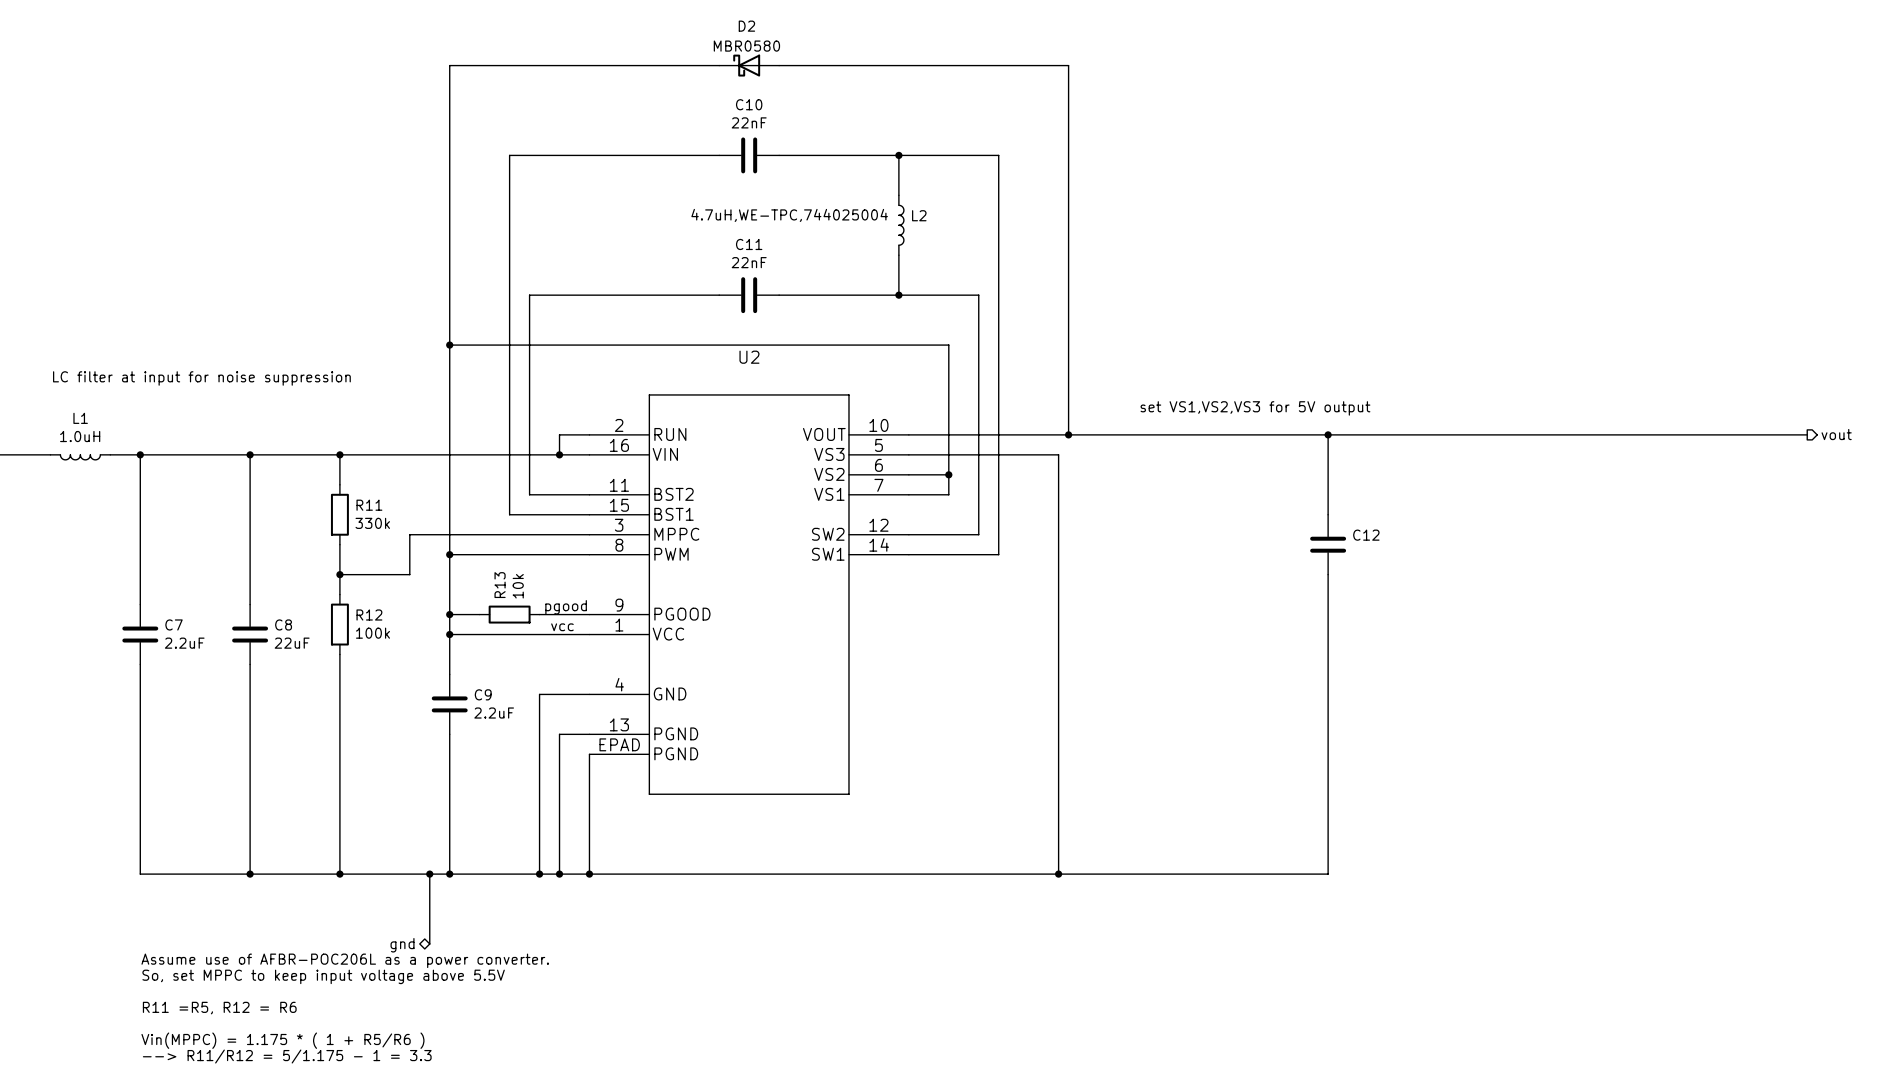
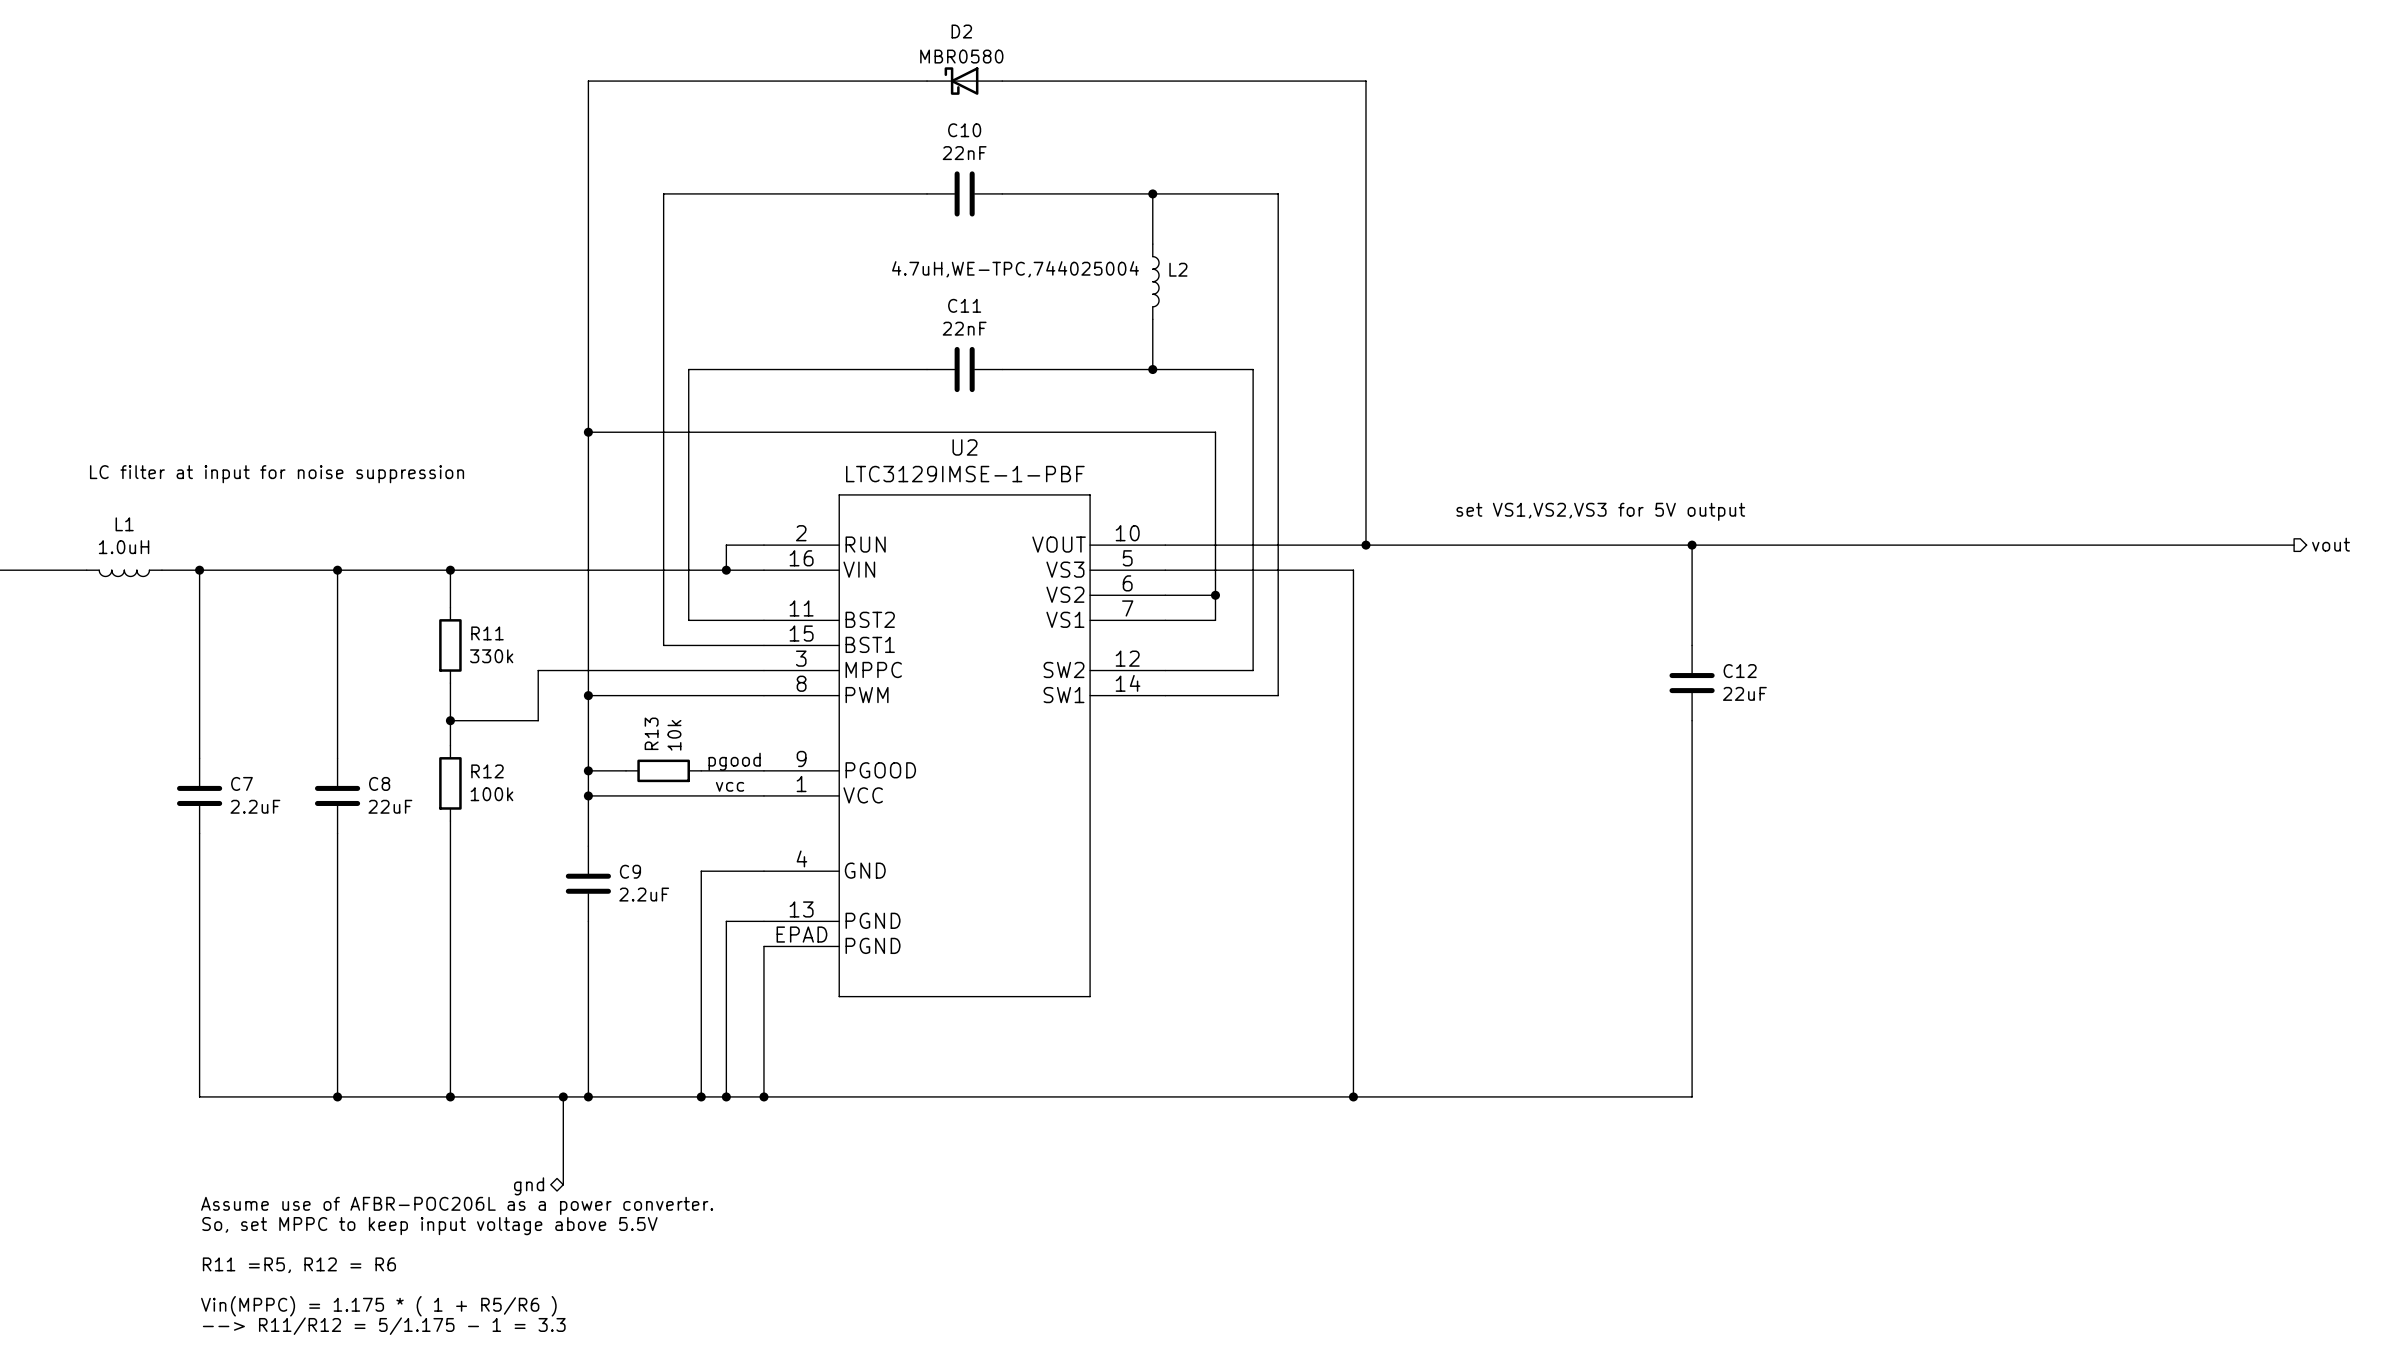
U2 value: none -> LTC3129IMSE-1-PBF (965, 474)
C12 value: none -> 22uF (1744, 693)

